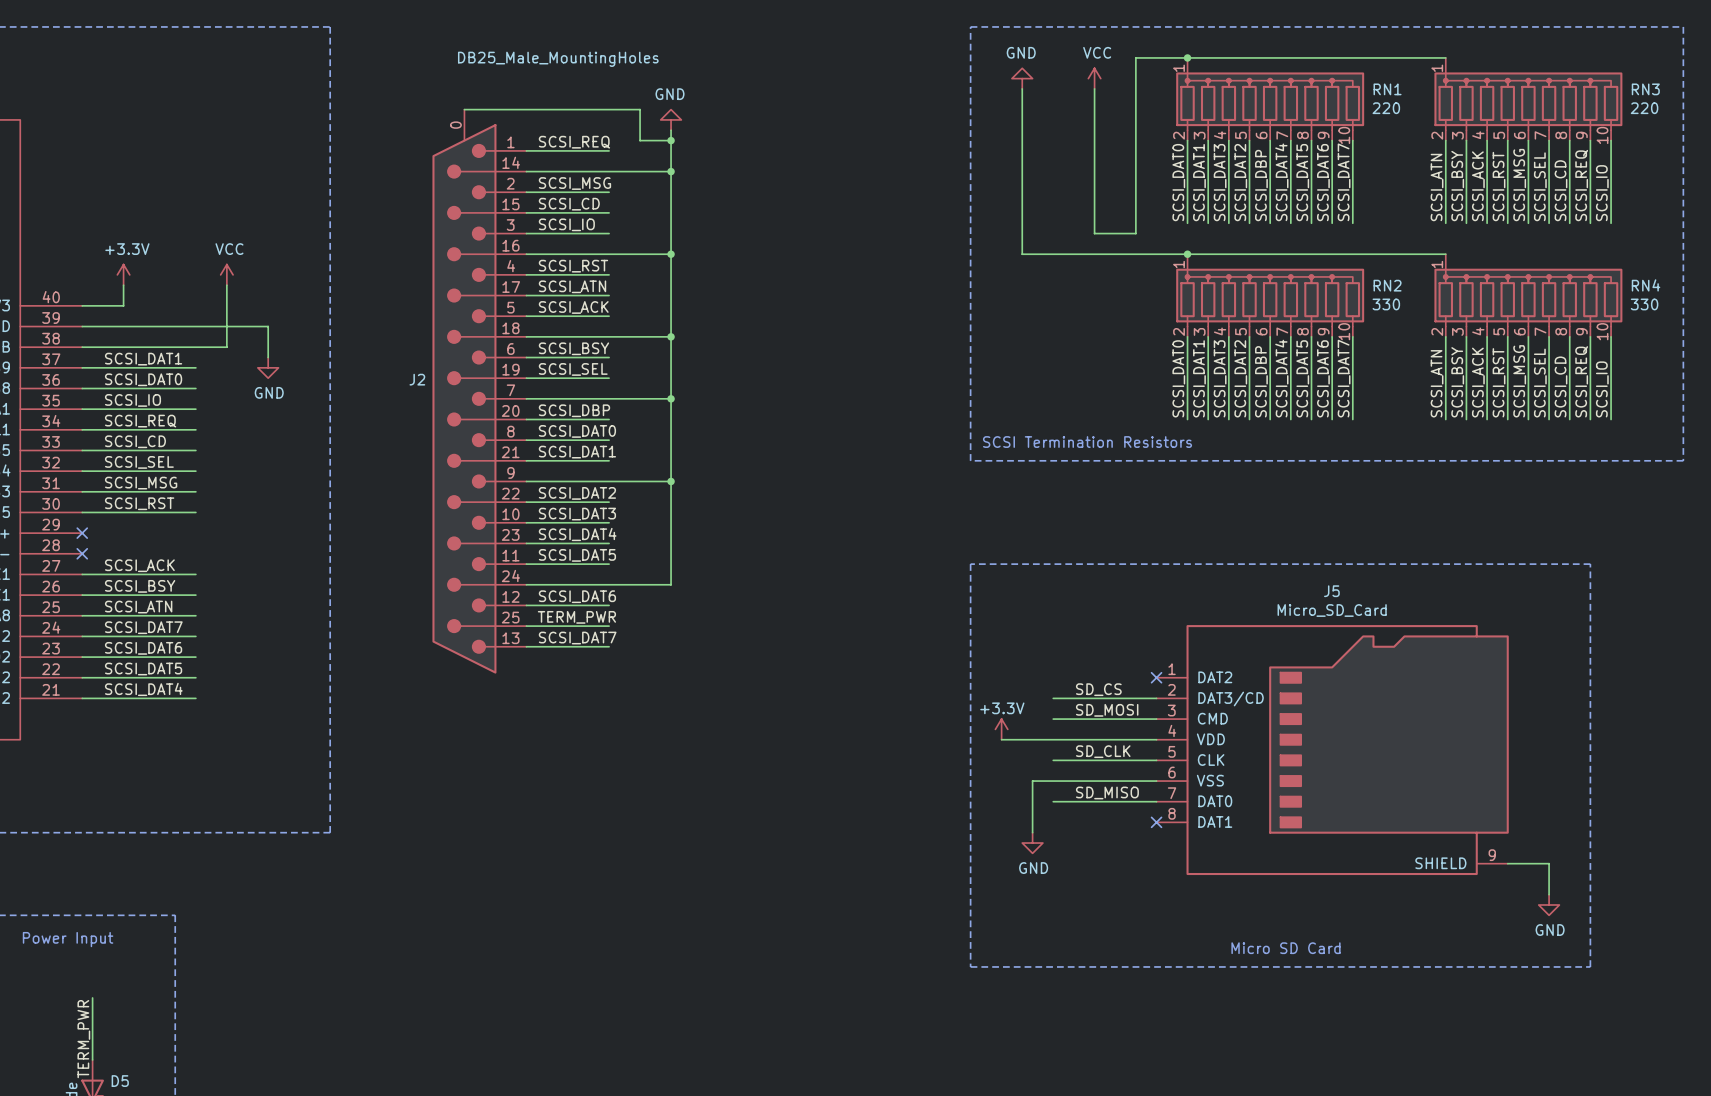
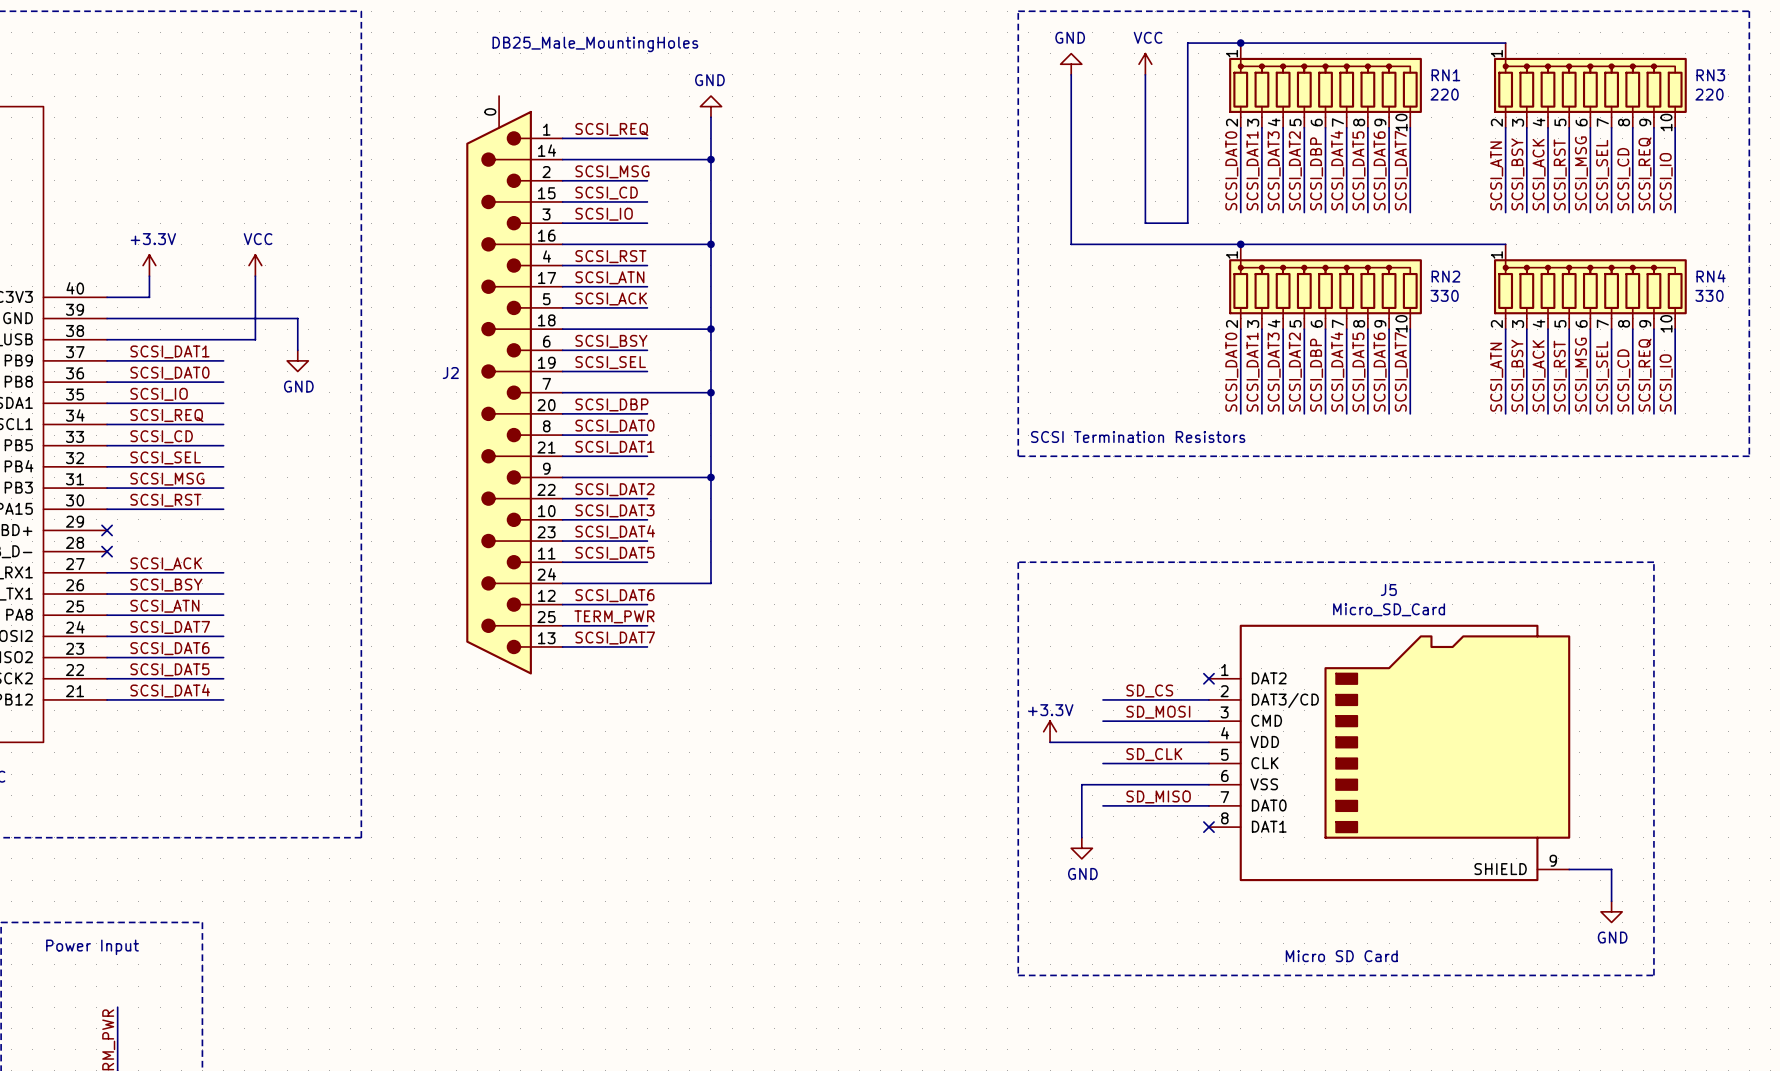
wire: (464, 109) (640, 109) (640, 140) (671, 140) -> none
junction: (671, 140) -> none

